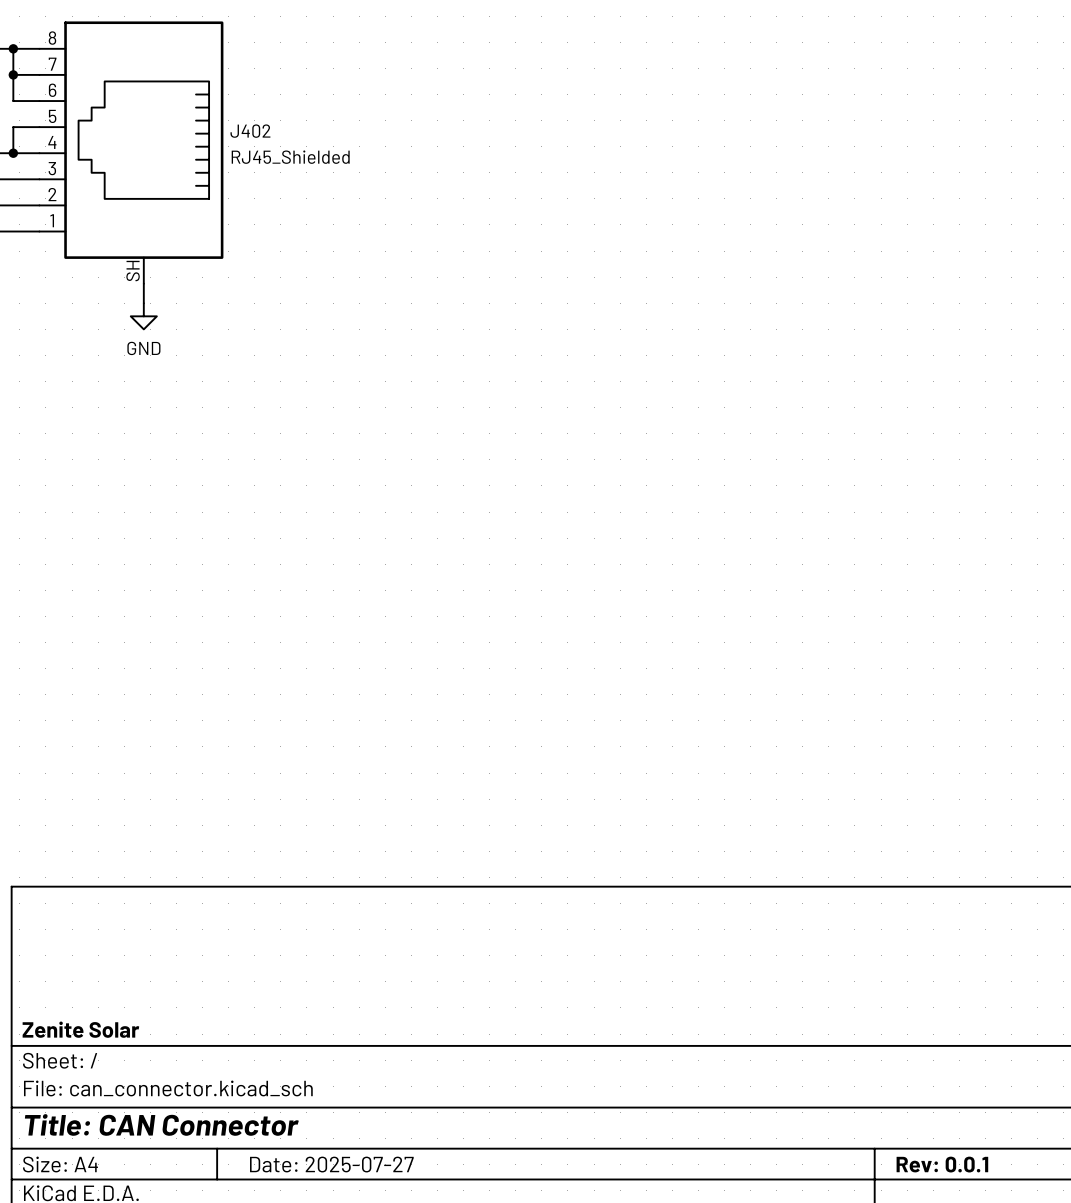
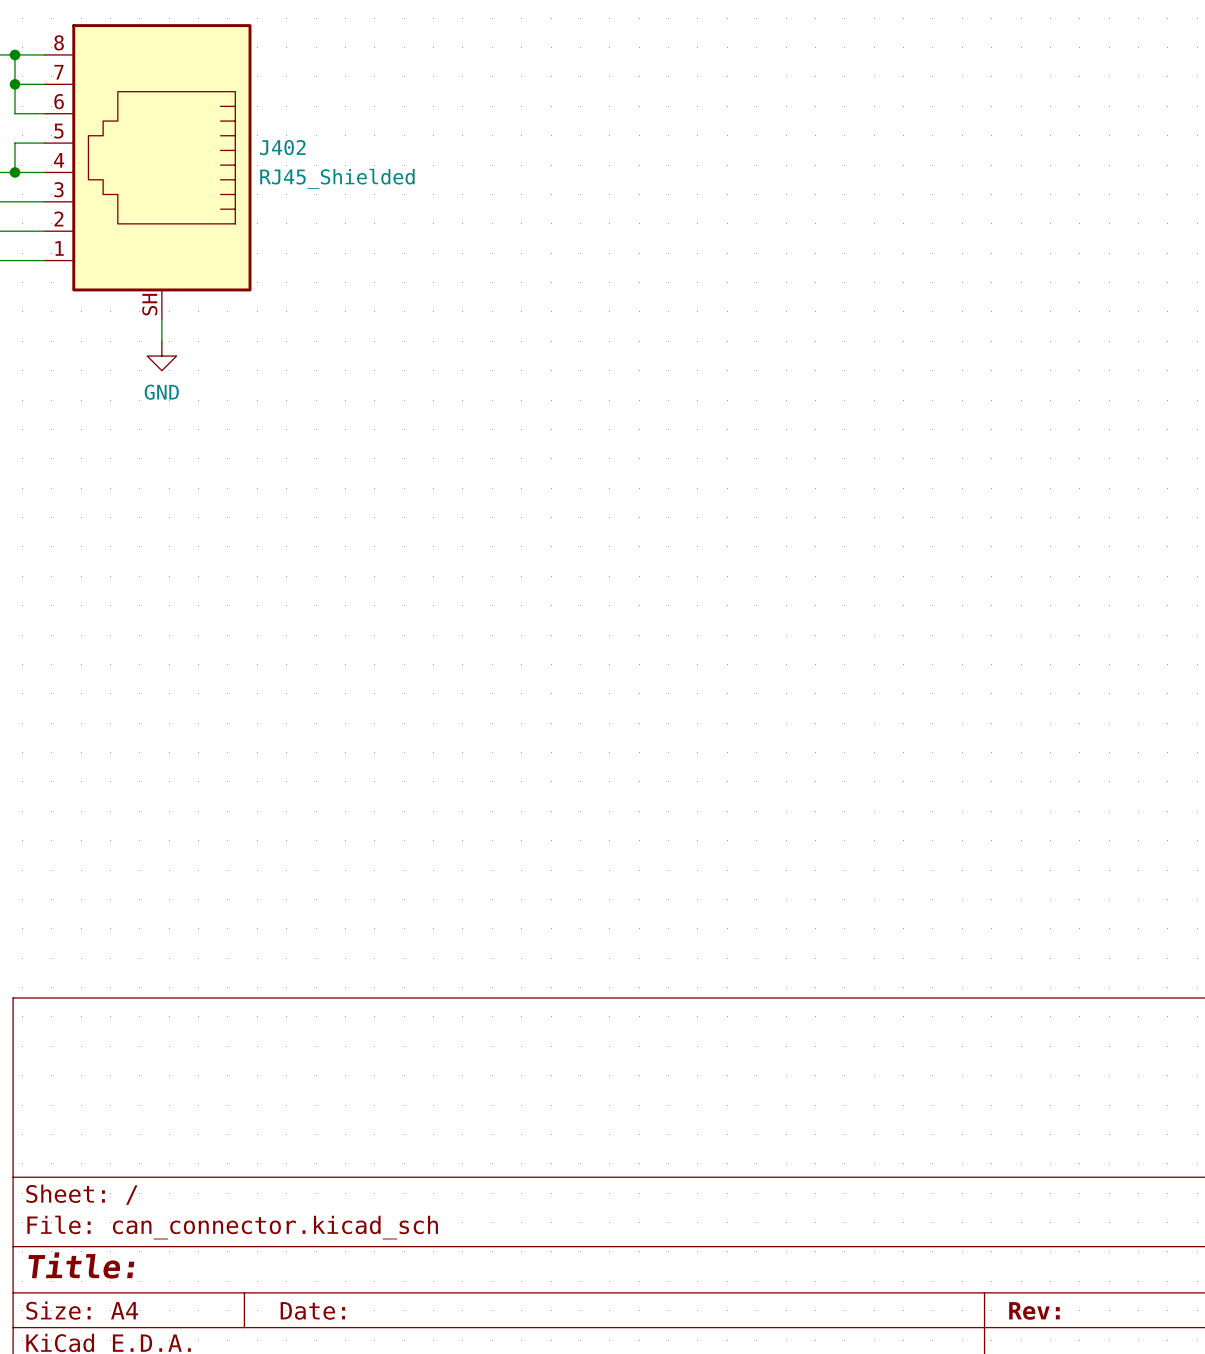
title block: Zenite Solar (80, 1029) -> none
title block: Title: CAN Connector (161, 1124) -> Title: (81, 1265)
title block: Date: 2025-07-27 (331, 1164) -> Date: (312, 1310)
title block: Rev: 0.0.1 (942, 1164) -> Rev: (1034, 1310)

